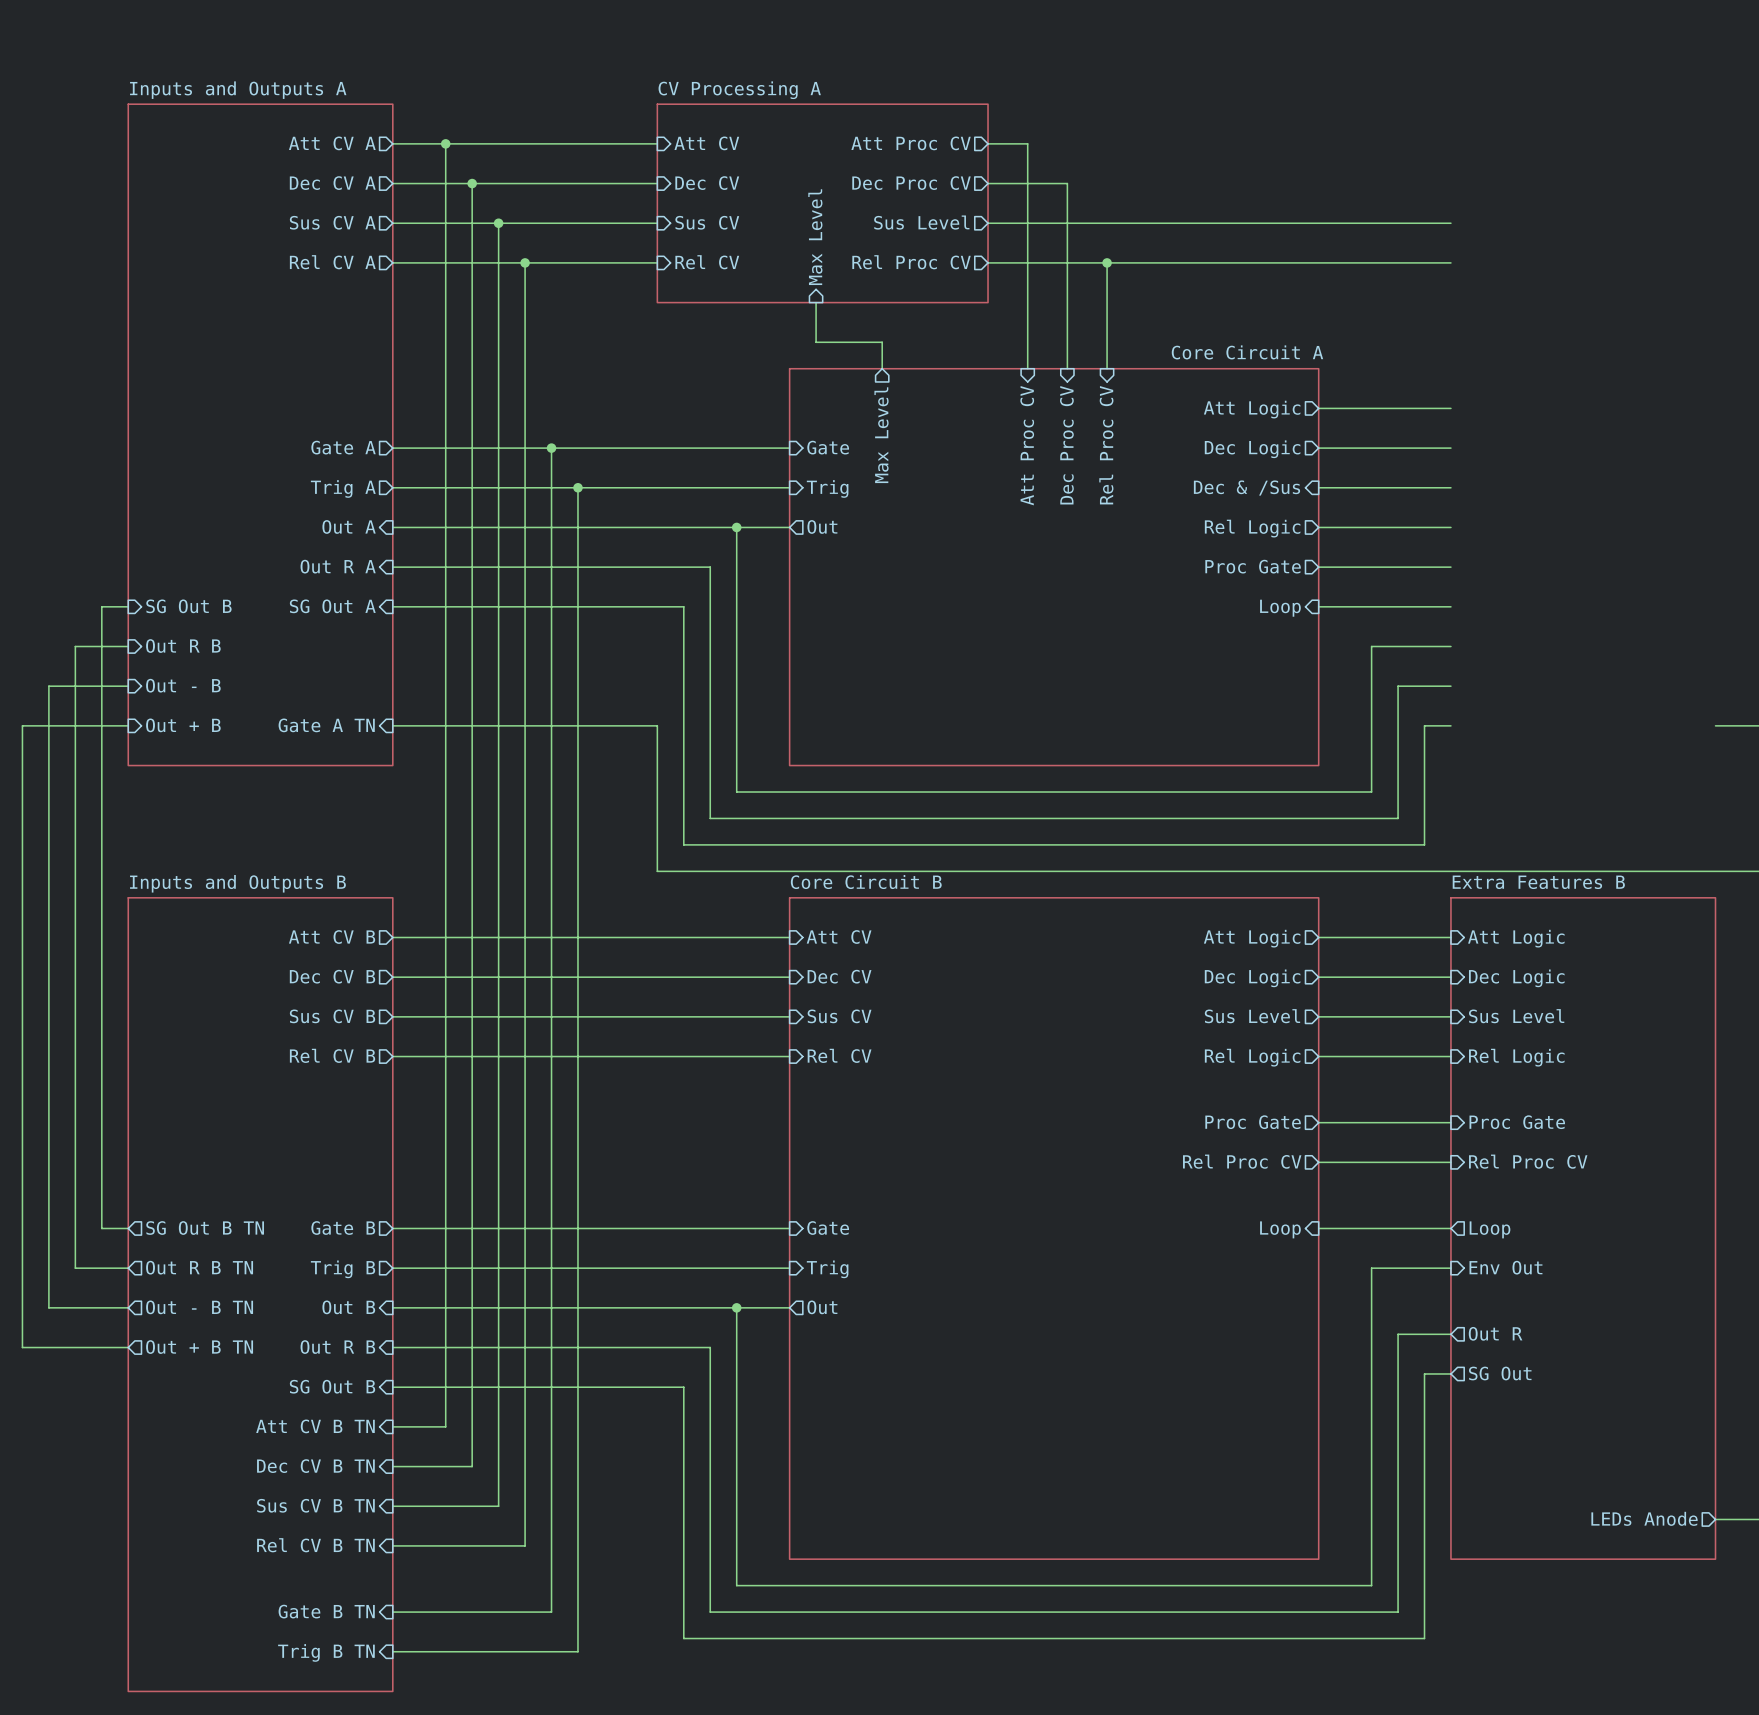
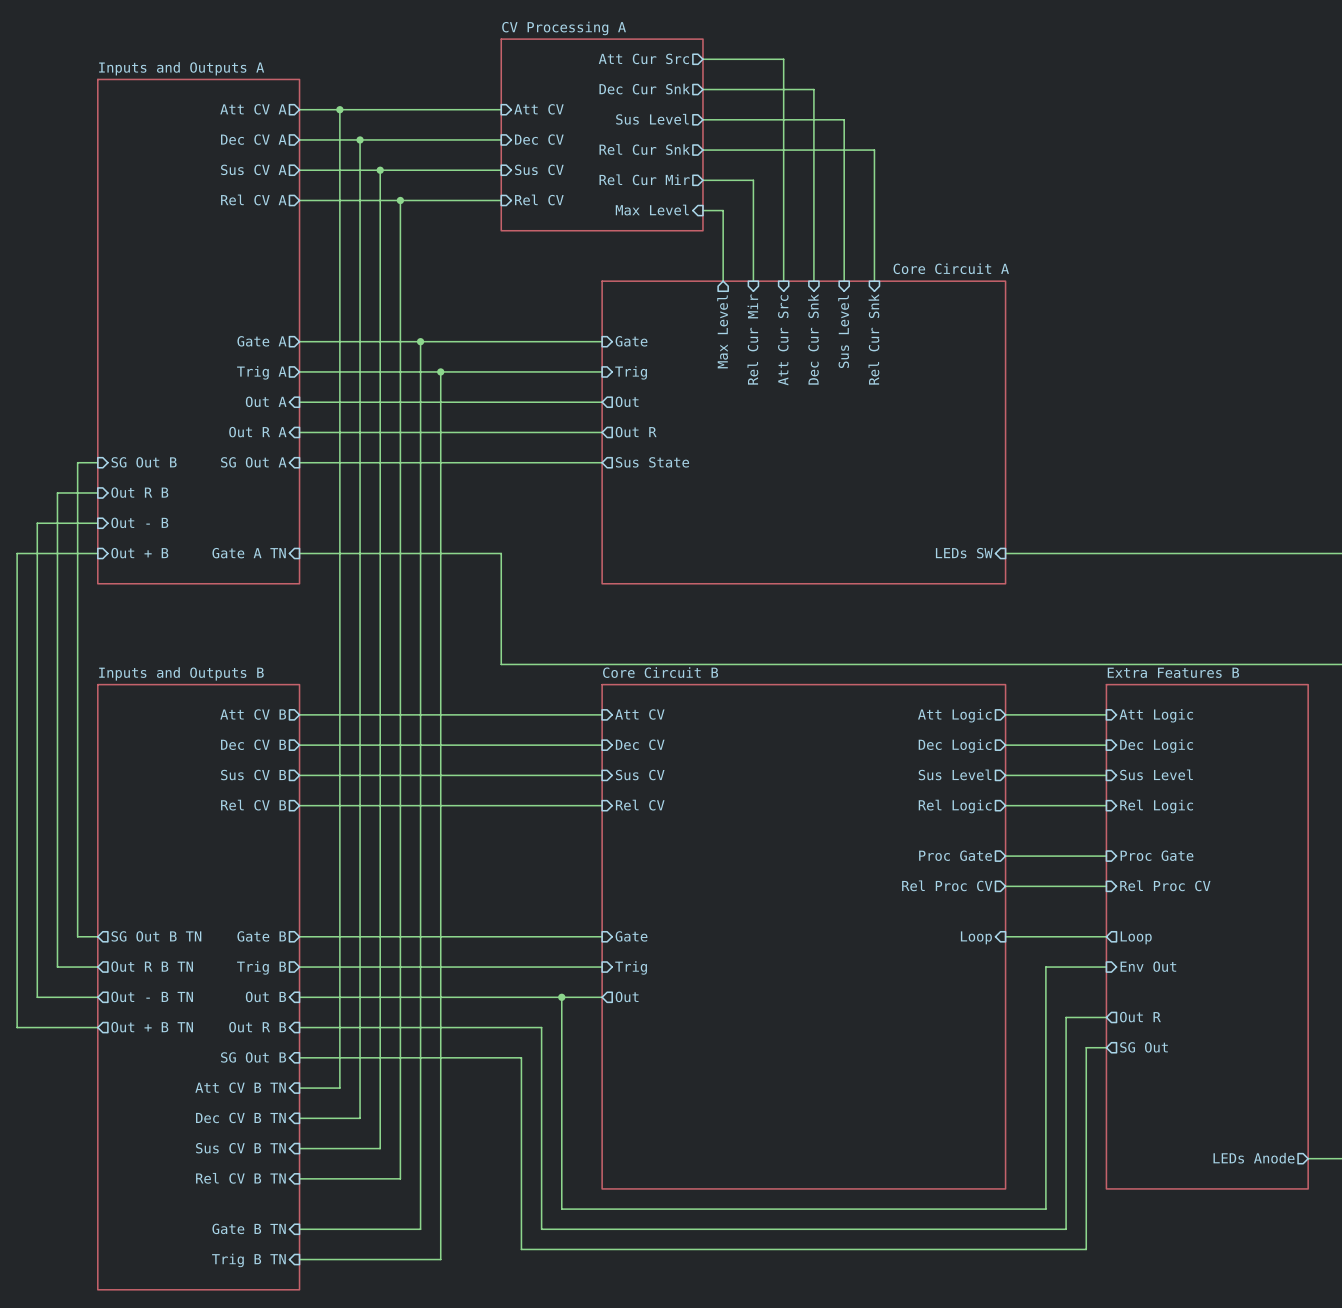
sheet pin: none -> Att Cur Src (643, 58)
sheet pin: none -> Dec Cur Snk (644, 89)
sheet pin: Att Proc CV (911, 143) -> none
wire: (988, 143) (1027, 143) -> (702, 59) (783, 59) (783, 109)
wire: none -> (702, 119) (844, 119) (844, 200)
sheet CV Processing A: none -> (602, 134)
sheet pin: Dec Proc CV (911, 183) -> none
wire: (988, 183) (1067, 183) -> (702, 89) (813, 89) (813, 139)
sheet pin: none -> Rel Cur Snk (644, 149)
wire: none -> (702, 150) (874, 150) (874, 281)
sheet CV Processing A: (822, 203) -> none
sheet pin position: Sus Level (921, 222) -> Sus Level (652, 119)
wire: (988, 223) (1450, 223) -> none
sheet pin: none -> Rel Cur Mir (644, 179)
wire: none -> (702, 180) (753, 180) (753, 281)
sheet pin rotation: 0° (815, 237) -> 90° counterclockwise (652, 210)
sheet pin: Rel Proc CV (911, 262) -> none
wire: (988, 262) (1450, 262) -> none
junction: (1107, 262) -> none
wire: none -> (702, 210) (723, 210) (723, 281)
wire: (816, 302) (816, 342) (882, 342) (882, 368) -> none
wire: (1318, 408) (1450, 408) -> none
sheet pin: Att Logic (1252, 409) -> none
sheet pin: Max Level (881, 435) -> none
sheet pin: none -> Max Level (722, 331)
sheet pin: none -> Rel Cur Mir (752, 339)
sheet pin: Att Proc CV (1027, 445) -> Att Cur Src (783, 340)
sheet pin: Dec Proc CV (1066, 445) -> Dec Cur Snk (813, 339)
sheet pin: Rel Proc CV (1106, 445) -> Sus Level (843, 331)
sheet pin: none -> Rel Cur Snk (873, 339)
wire: (1318, 448) (1450, 448) -> none
sheet pin: Dec Logic (1252, 449) -> none
wire: (1318, 487) (1450, 487) -> none
sheet pin: Dec & /Sus (1246, 488) -> none
wire: (736, 527) (736, 792) (1371, 792) (1371, 646) (1450, 646) -> none
junction: (736, 527) -> none
wire: (1318, 527) (1450, 527) -> none
sheet pin: Rel Logic (1252, 528) -> none
sheet pin: none -> Out R (636, 432)
sheet pin: Proc Gate (1253, 566) -> none
wire: (710, 567) (710, 818) (1398, 818) (1398, 686) (1450, 686) -> (541, 432) (602, 432)
wire: (1318, 567) (1450, 567) -> none
wire: (683, 606) (683, 844) (1424, 844) (1424, 725) -> (521, 462) (602, 462)
sheet pin: none -> Sus State (652, 462)
wire: (1318, 606) (1450, 606) -> none
sheet pin: Loop (1280, 608) -> none
sheet pin: none -> LEDs SW (964, 553)
wire: none -> (1005, 553) (1086, 553)
wire: none -> (1106, 553) (1308, 553)

